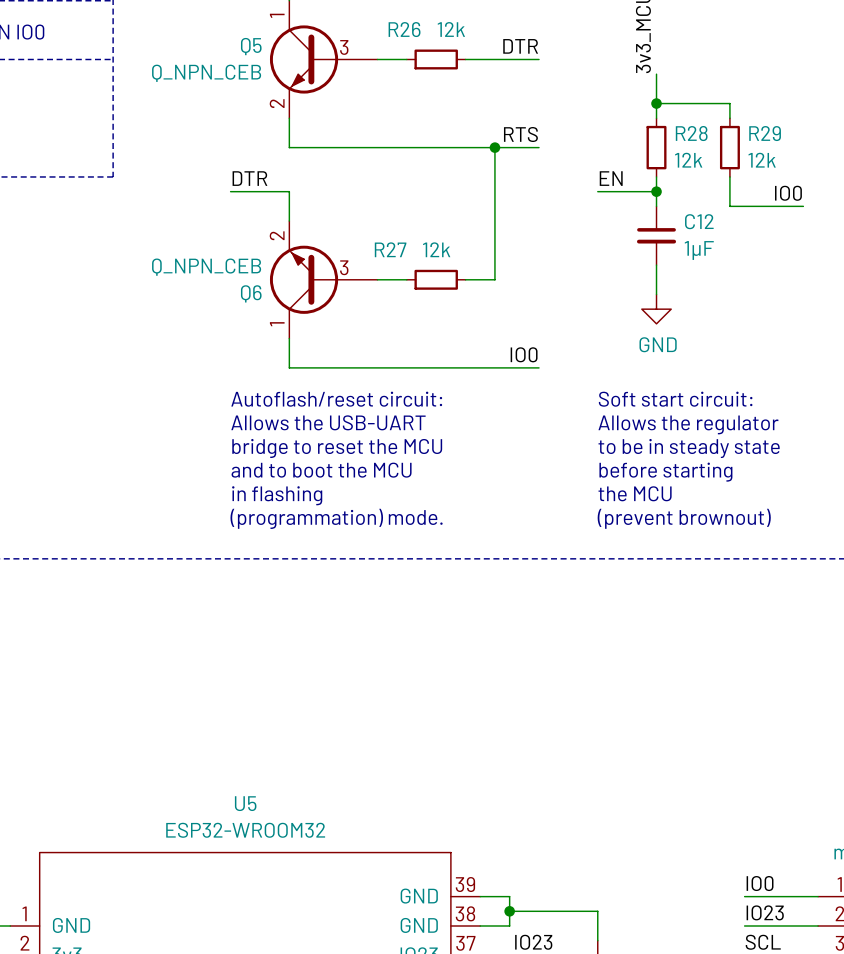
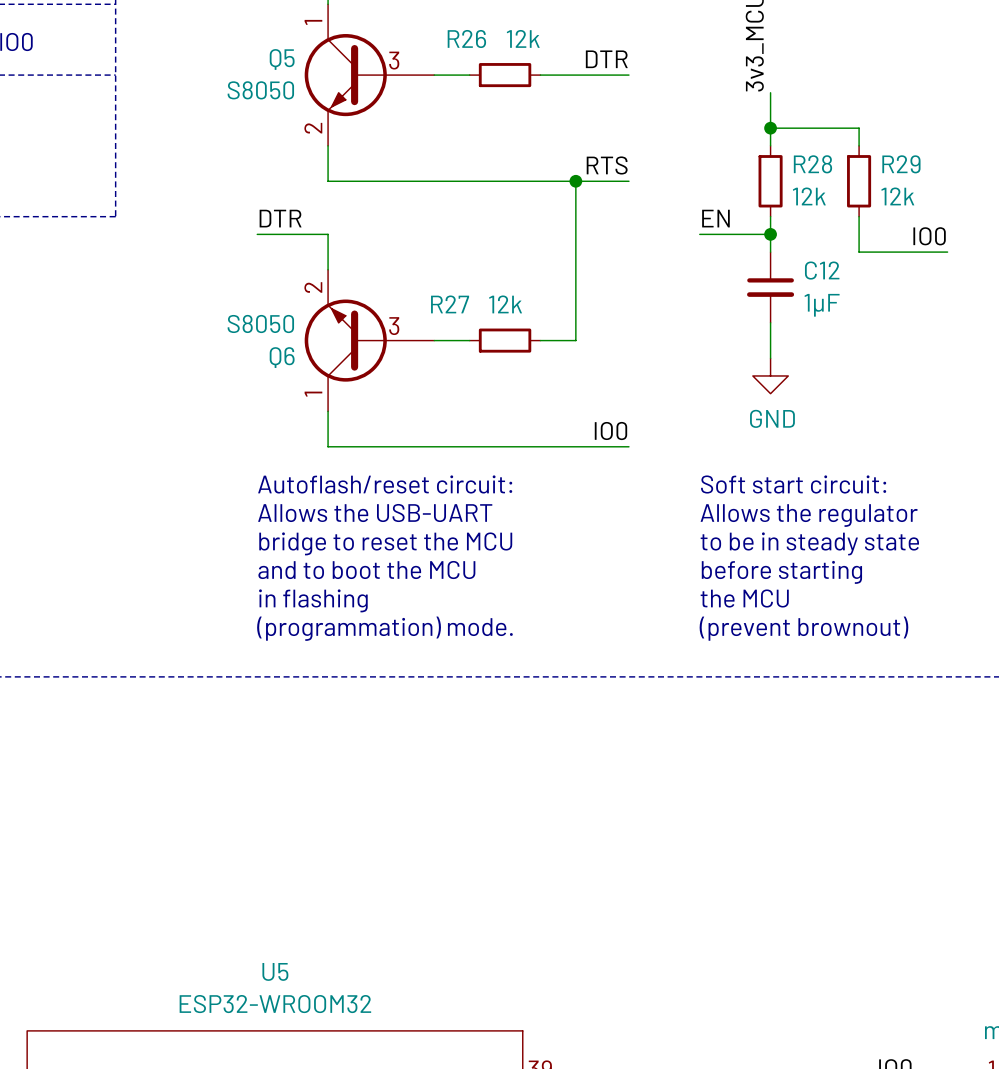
Q5 value: Q_NPN_CEB (206, 73) -> S8050 (260, 90)
Q6 value: Q_NPN_CEB (206, 267) -> S8050 (260, 323)

